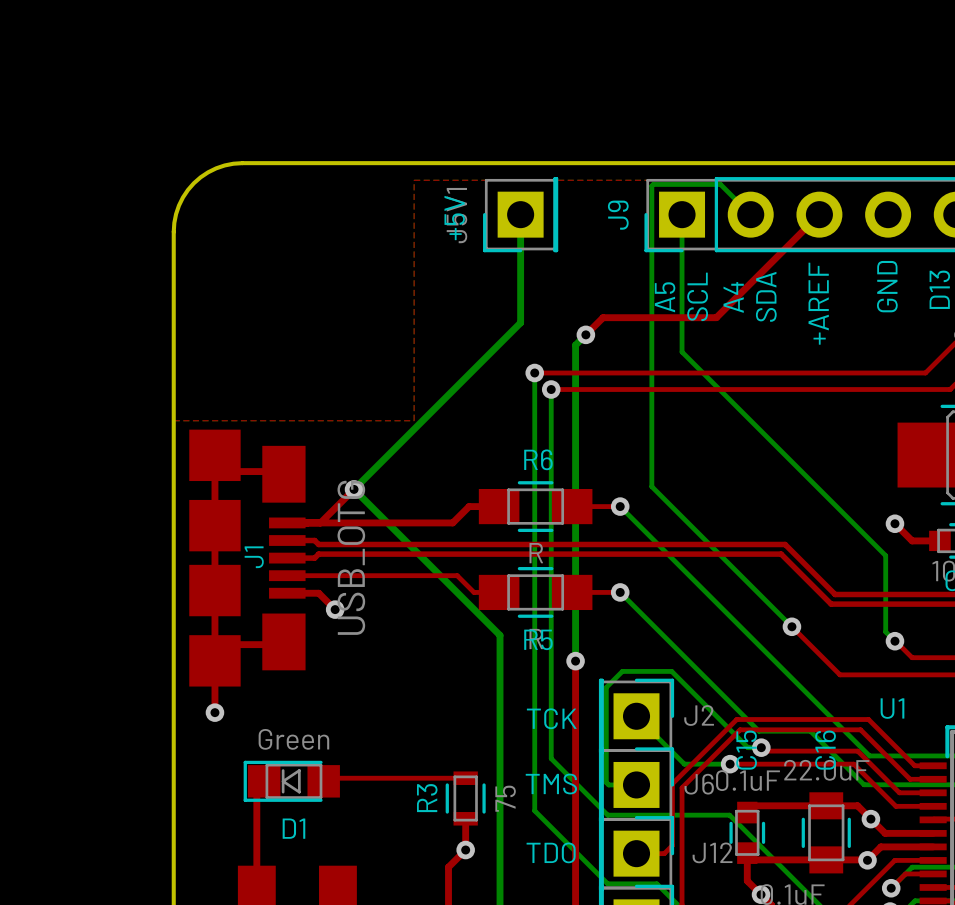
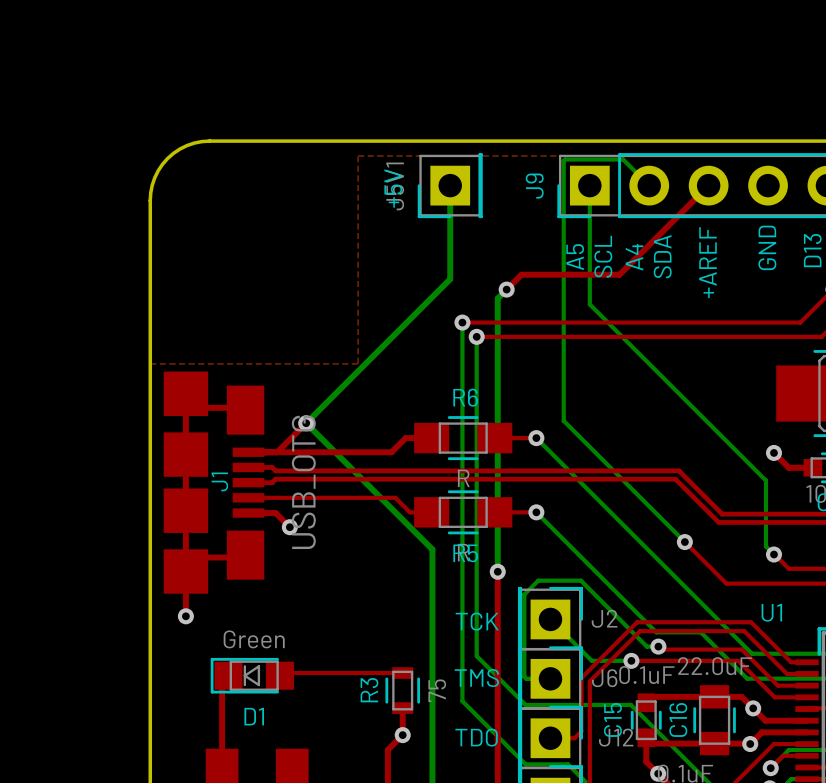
C15 name position: C15 (746, 750) -> C15 (612, 719)
C16 name position: C16 (825, 750) -> C16 (678, 719)

